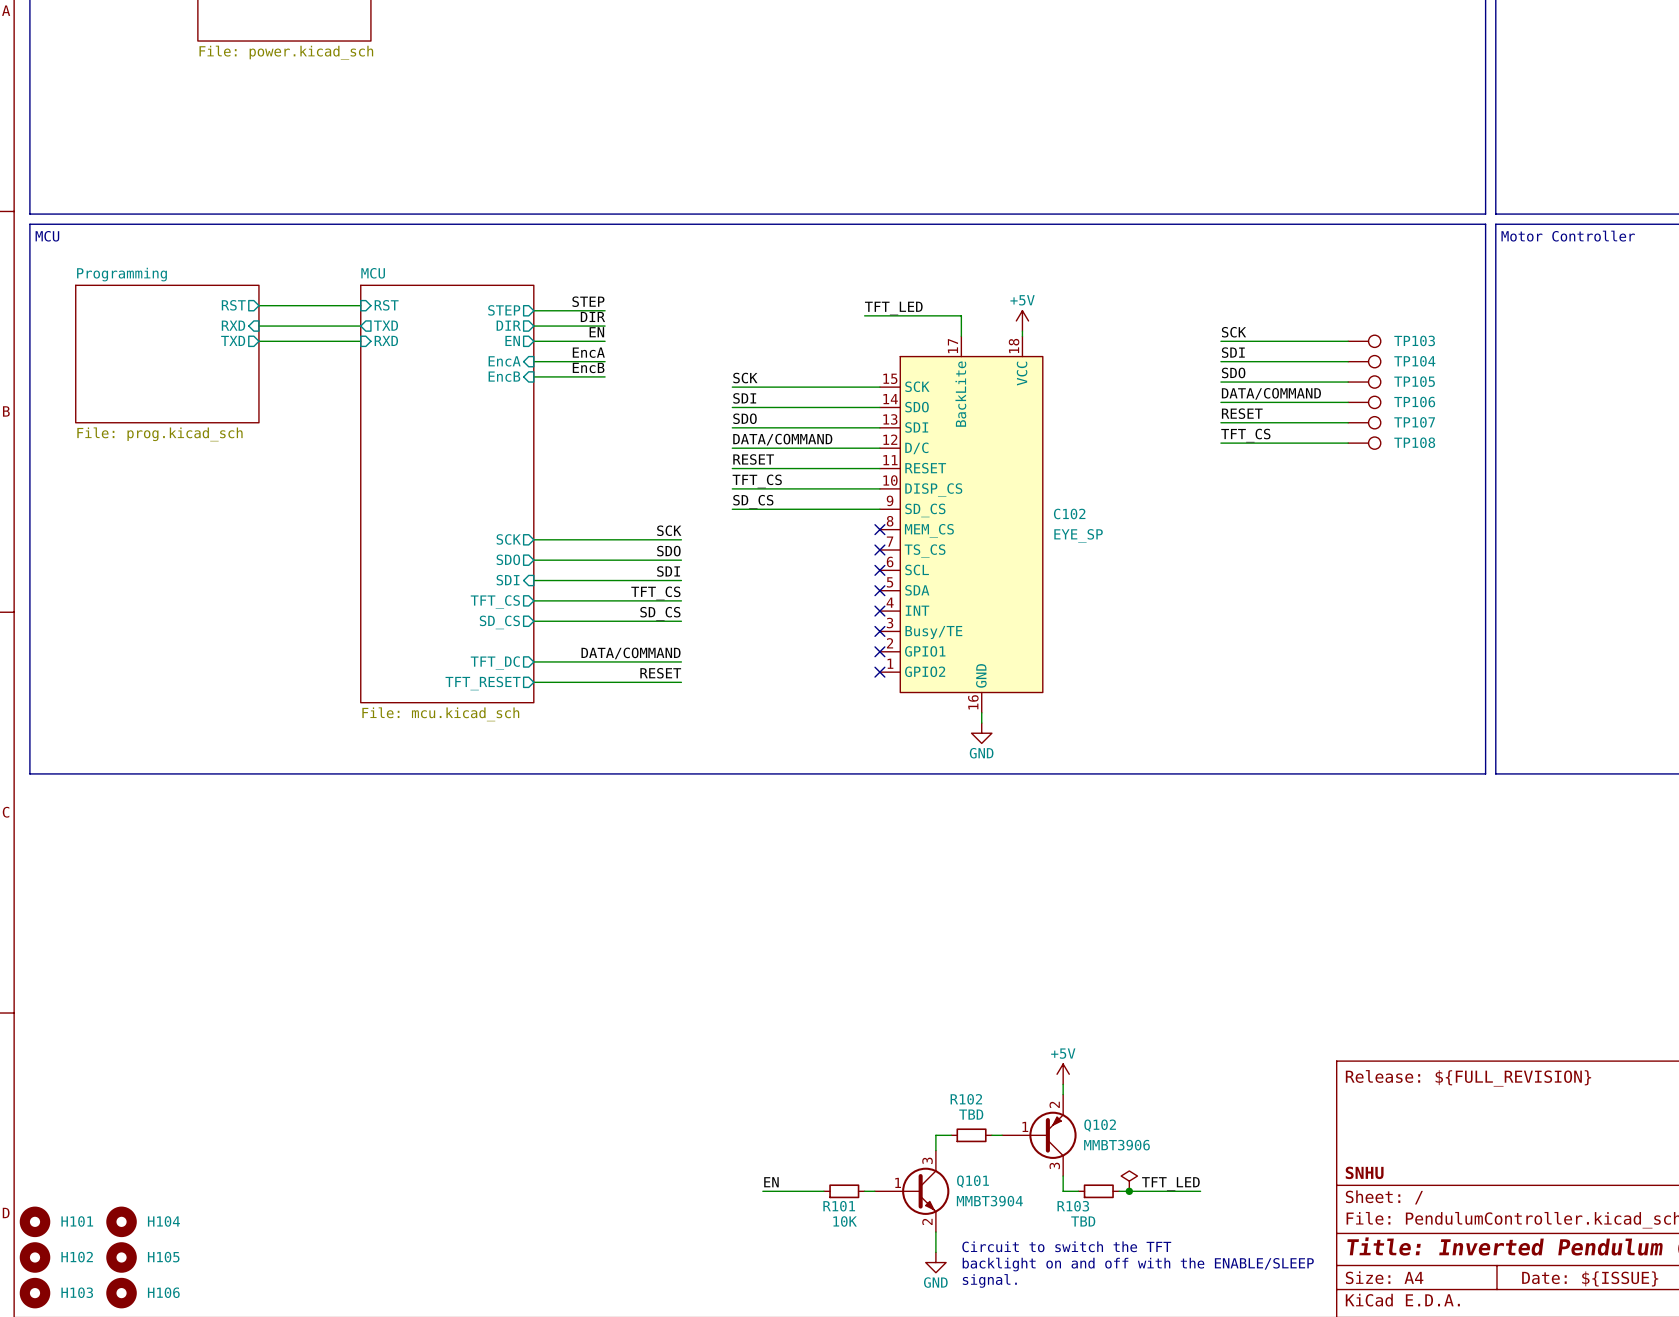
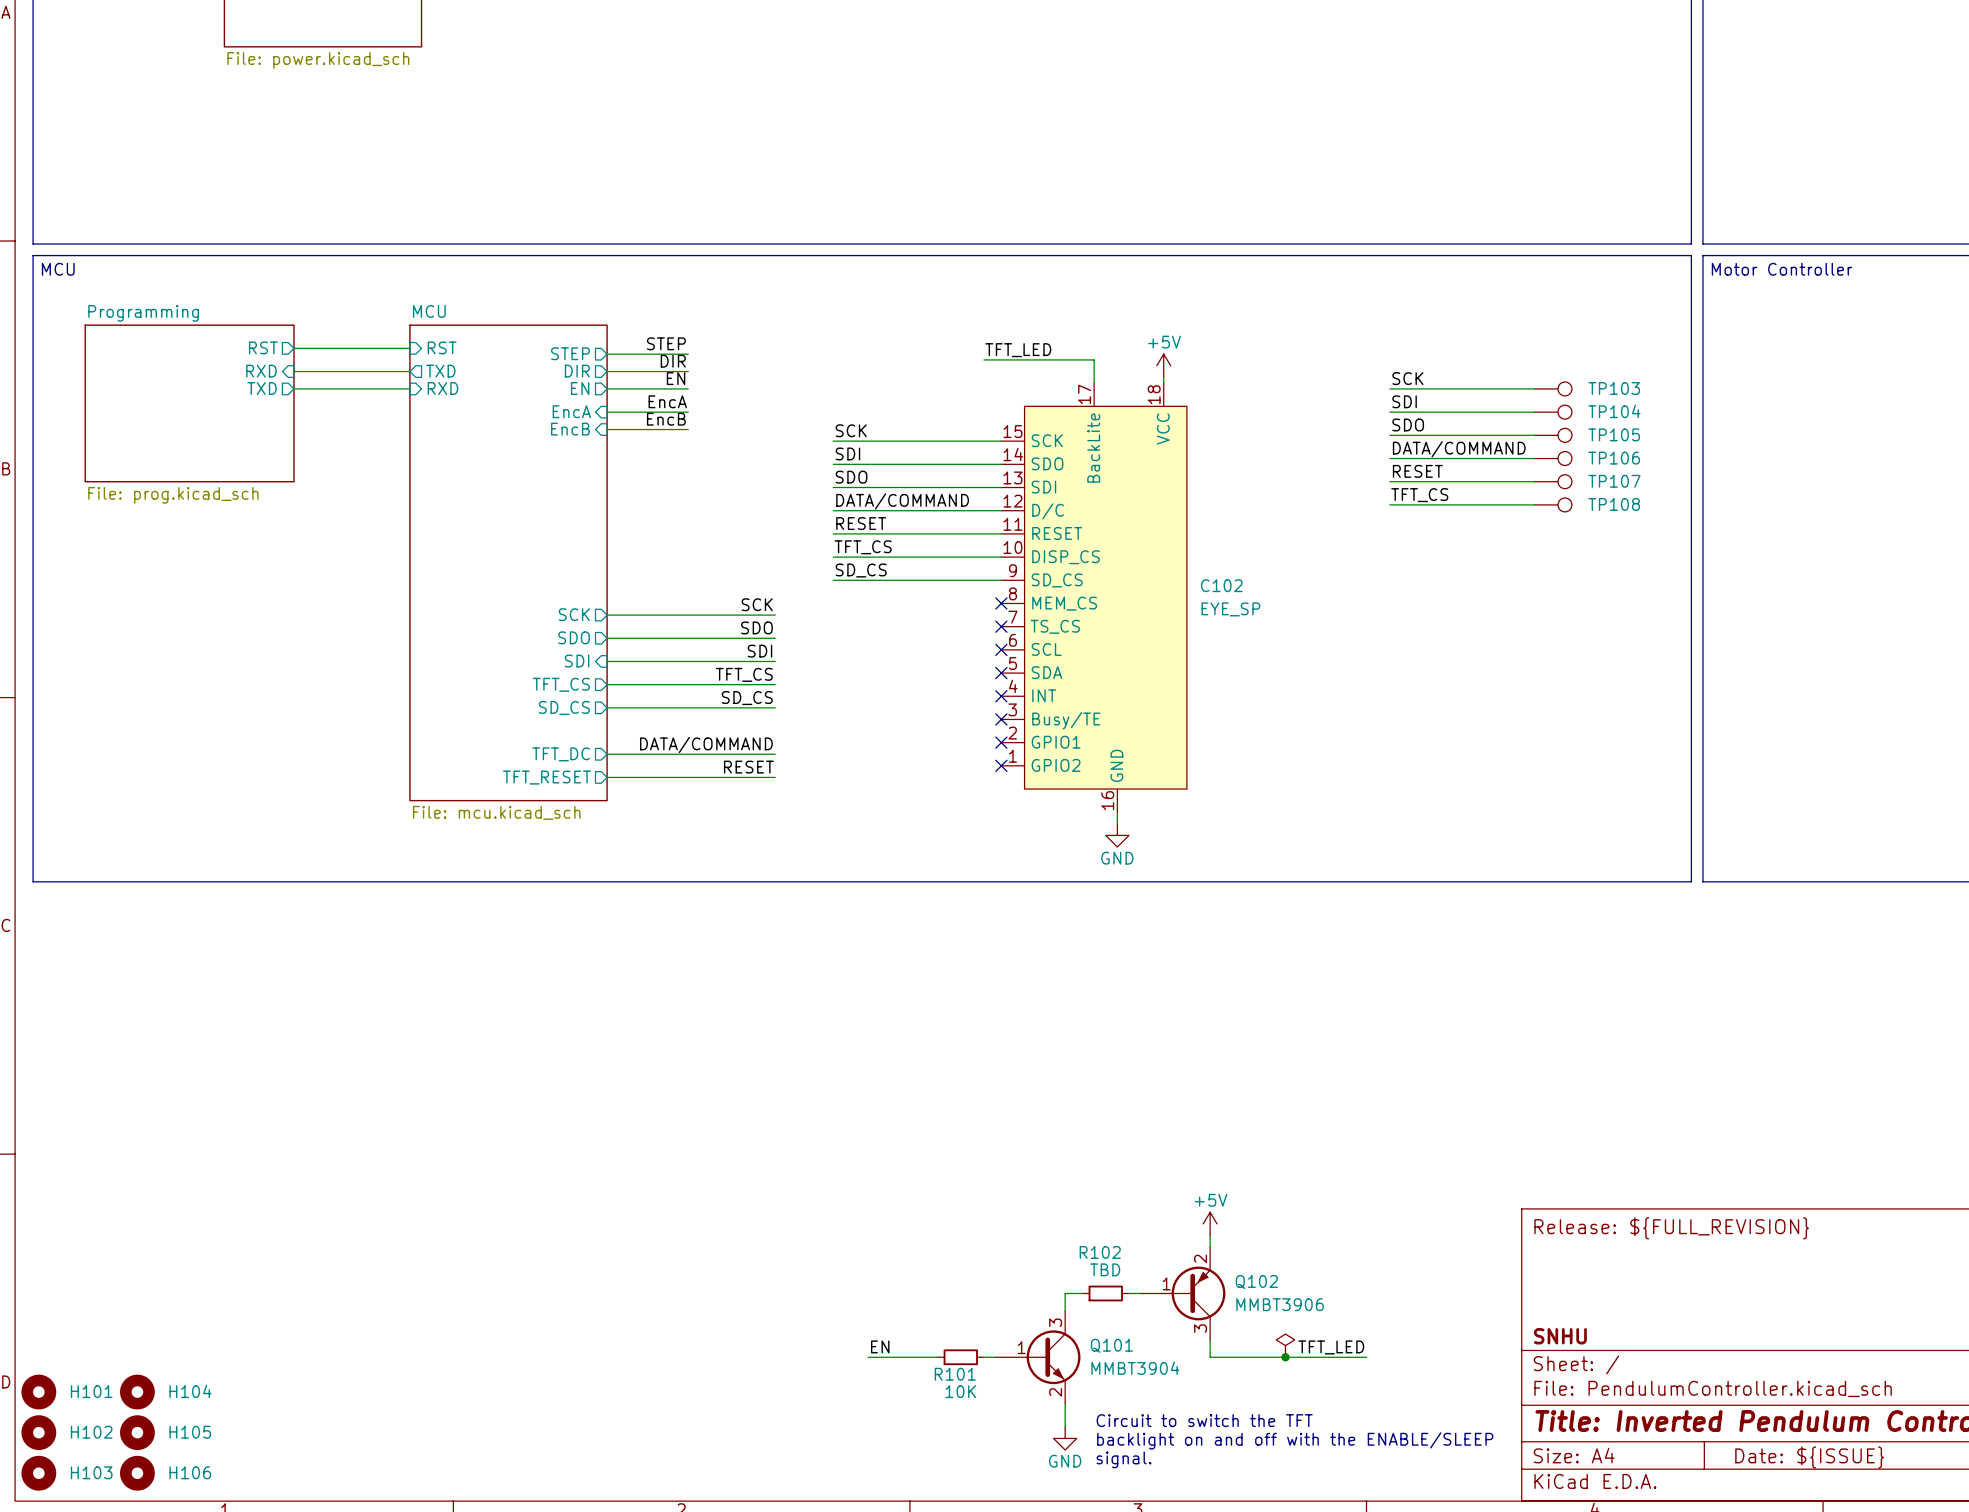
wire: none -> (1227, 1357) (1273, 1357)
R103: TBD (1098, 1191) -> none

